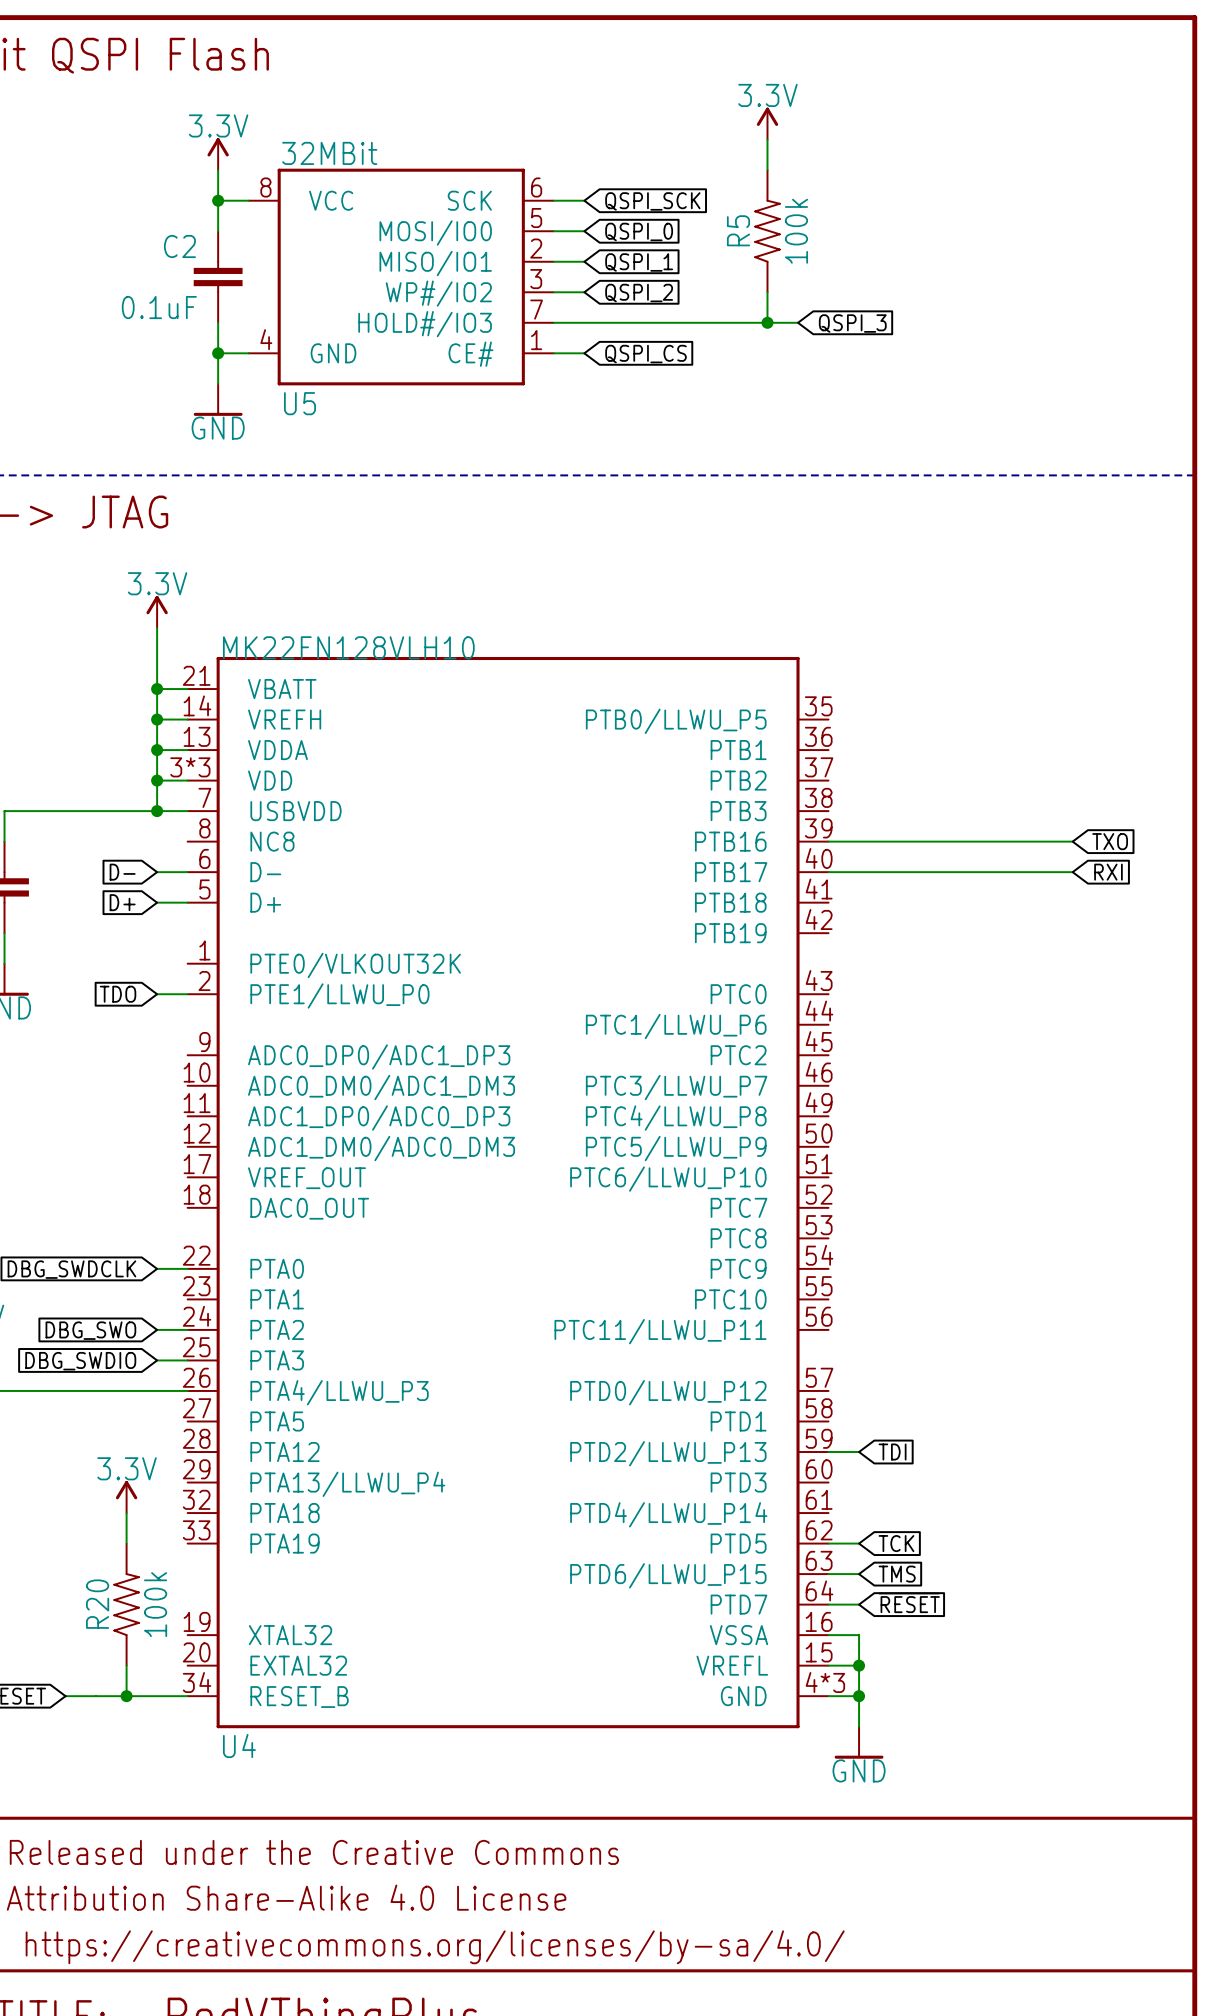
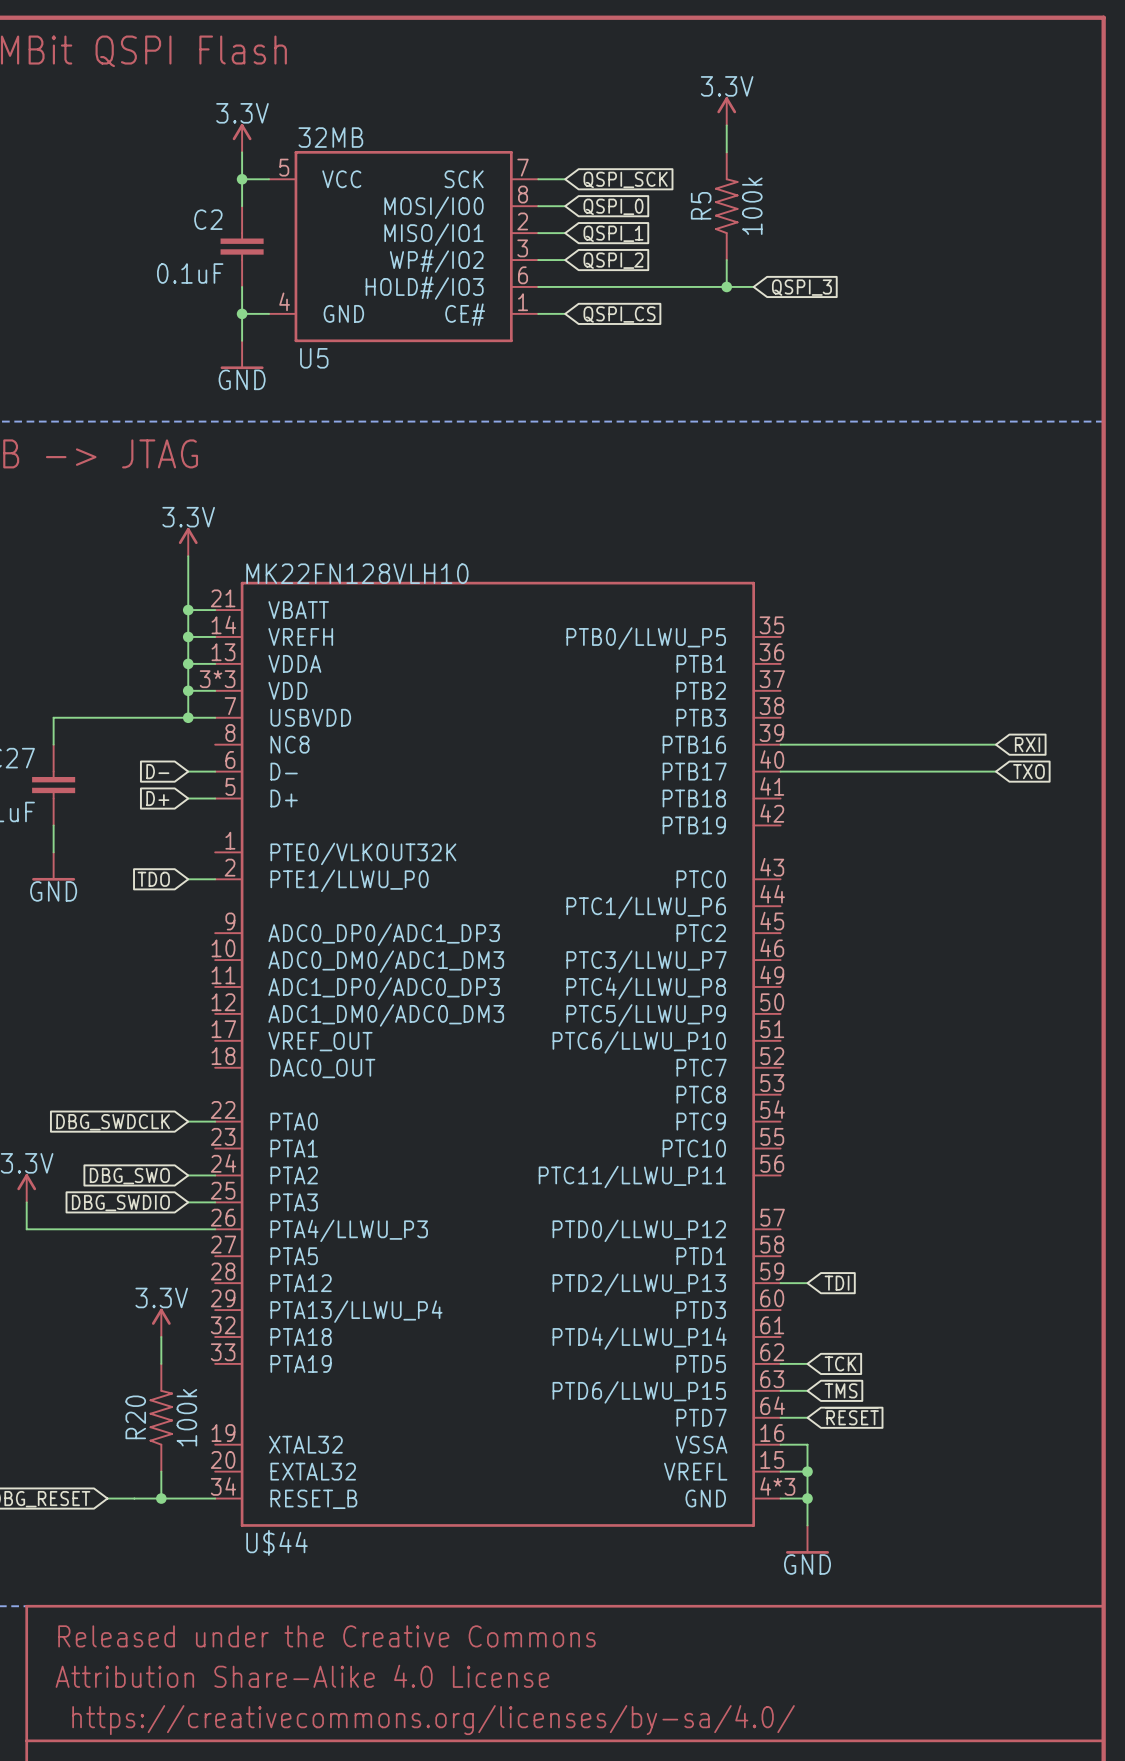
U5 value: 32MBit (329, 153) -> 32MB (330, 137)
U5 pin number: 8 (265, 187) -> 5 (284, 167)
U5 pin number: 6 (536, 187) -> 7 (523, 167)
U5 pin number: 5 (536, 218) -> 8 (523, 194)
U5 pin number: 7 (536, 309) -> 6 (523, 275)
global label: TXO (1110, 841) -> RXI (1027, 744)
global label: RXI (1108, 872) -> TXO (1028, 771)
U4 name: U4 (239, 1746) -> U$44 (277, 1542)

